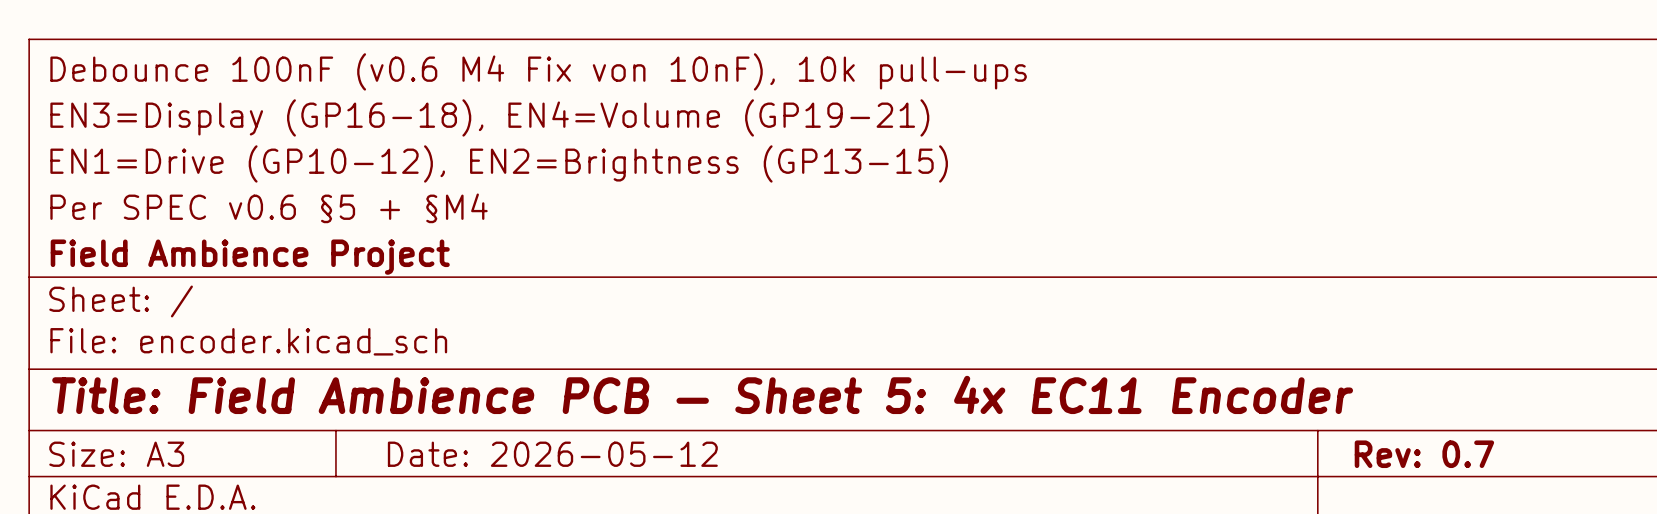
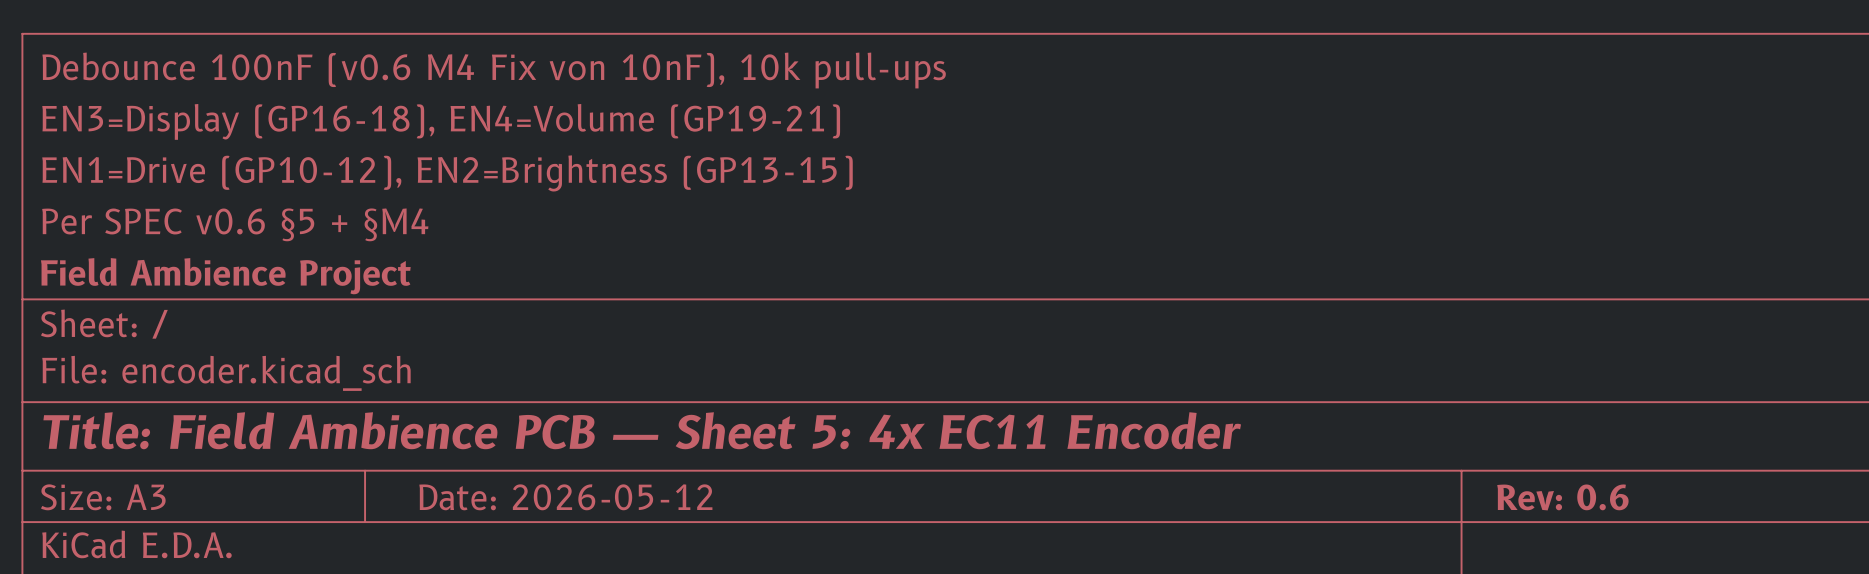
title block: Rev: 0.7 (1424, 454) -> Rev: 0.6 (1562, 497)

